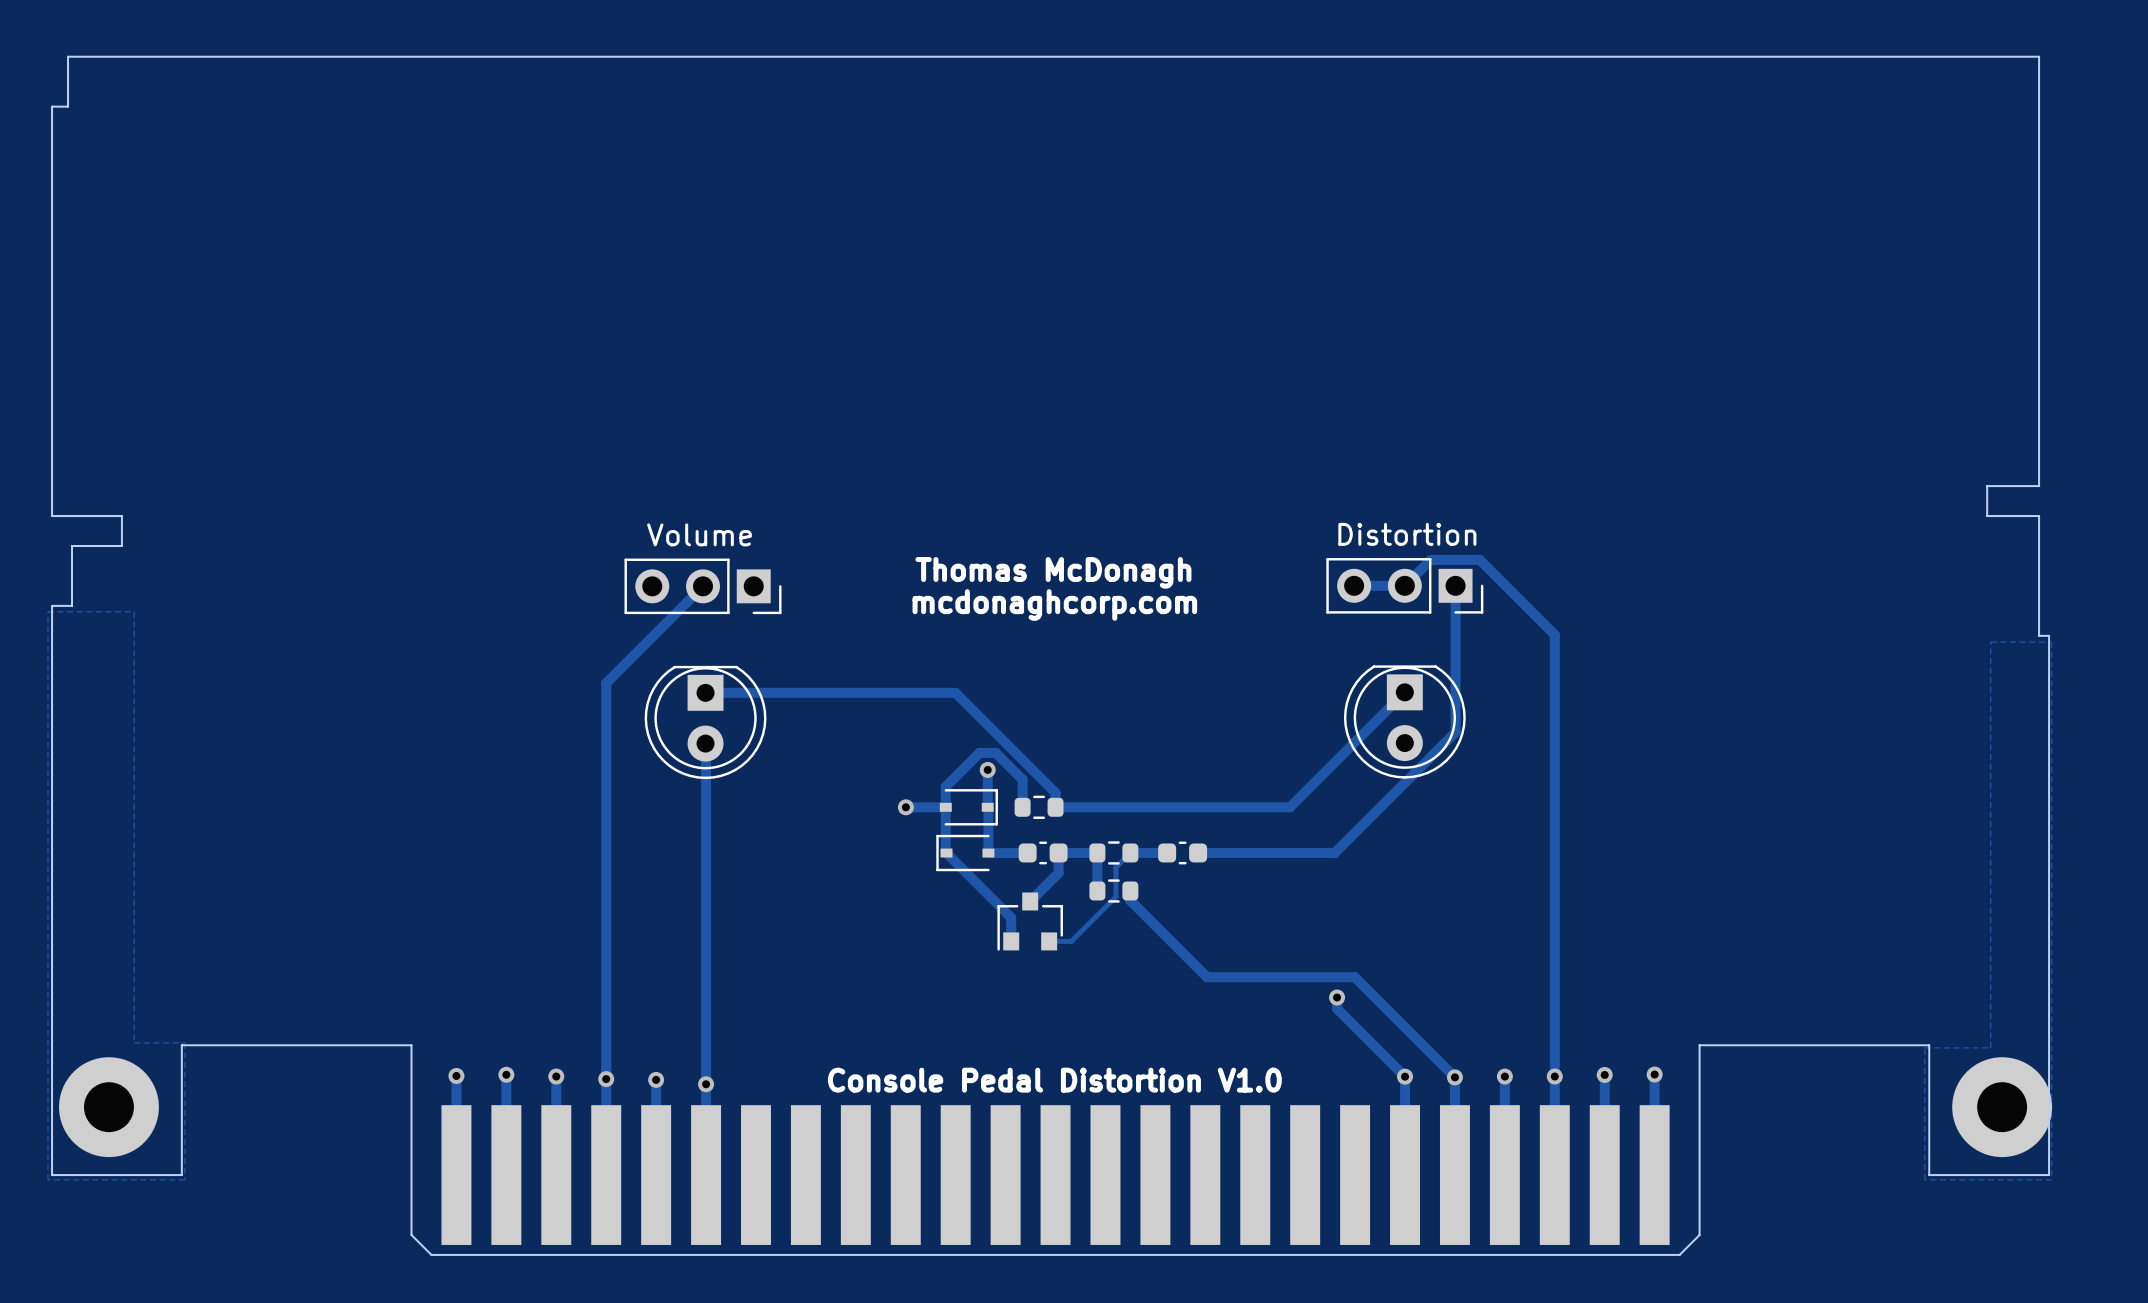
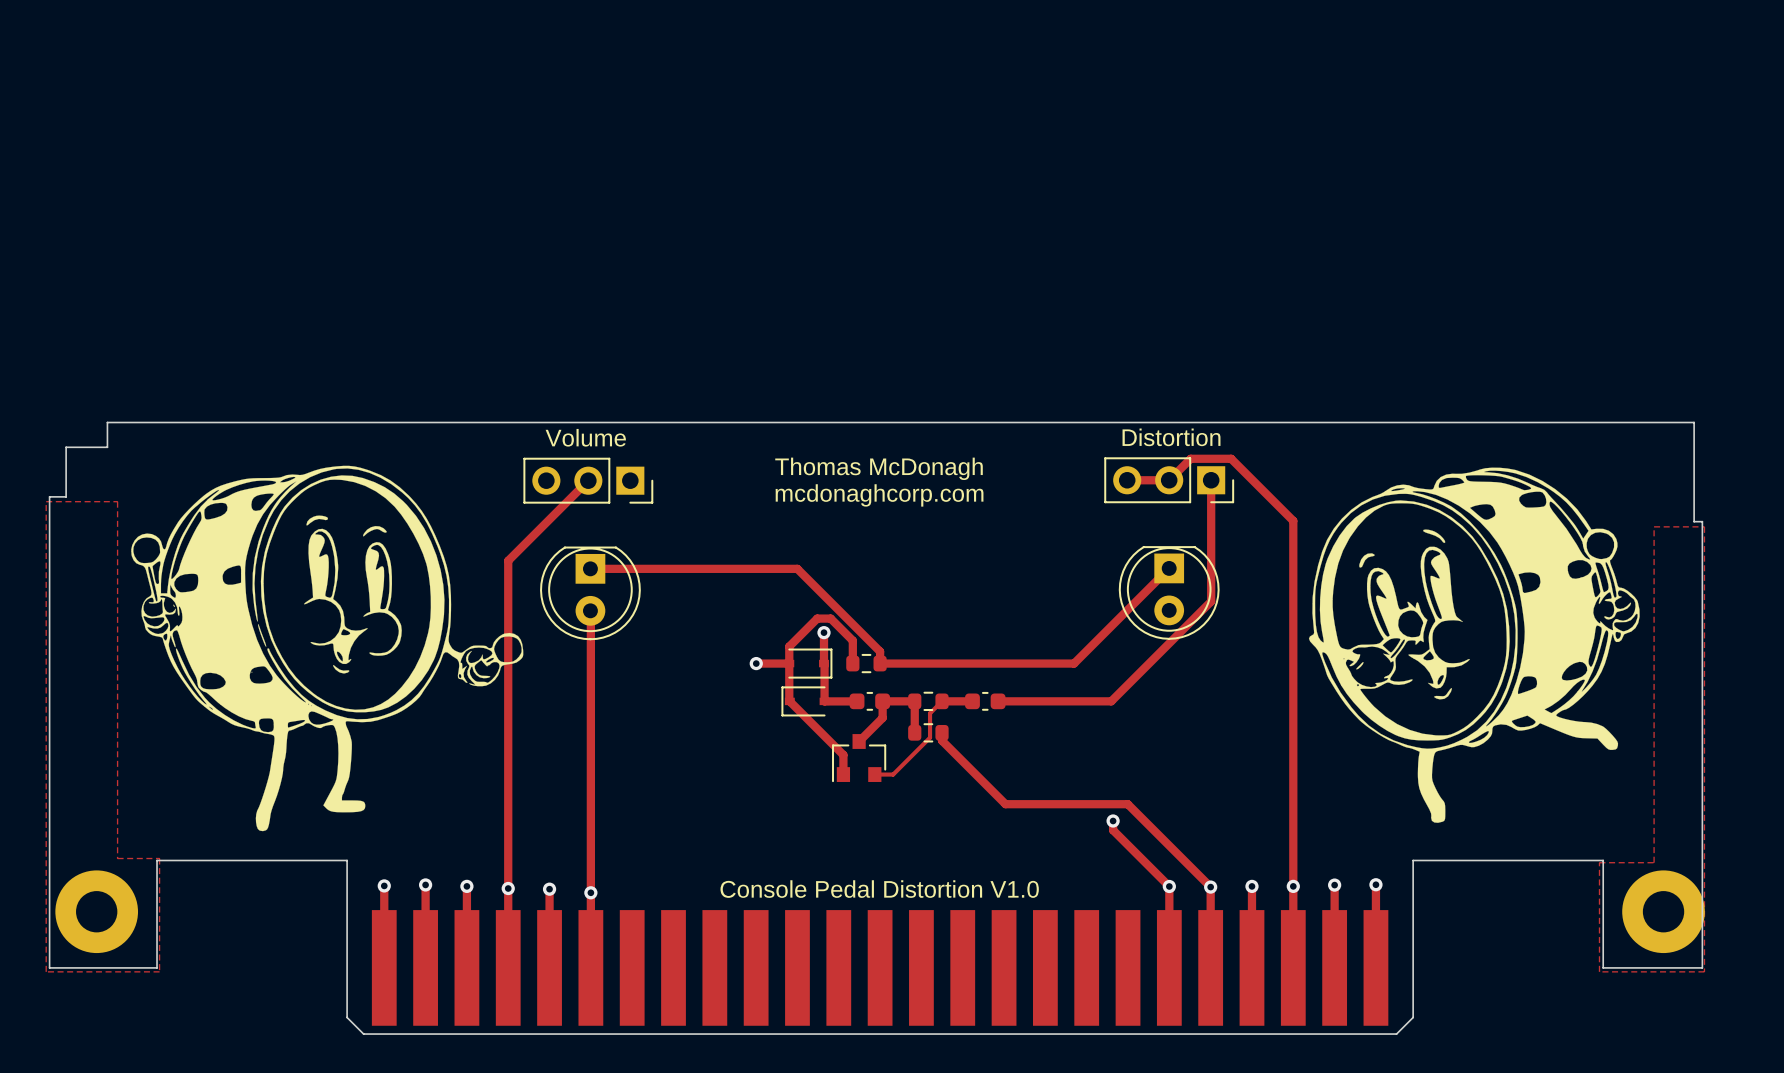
board edge: (121, 516) (52, 516) (52, 106) (68, 106) (68, 56) (2039, 56) (2039, 486) (1987, 486) (1987, 516) -> (107, 422) (1651, 422)
drawing: none -> [131, 465, 524, 832]
drawing: none -> [1308, 467, 1640, 823]

